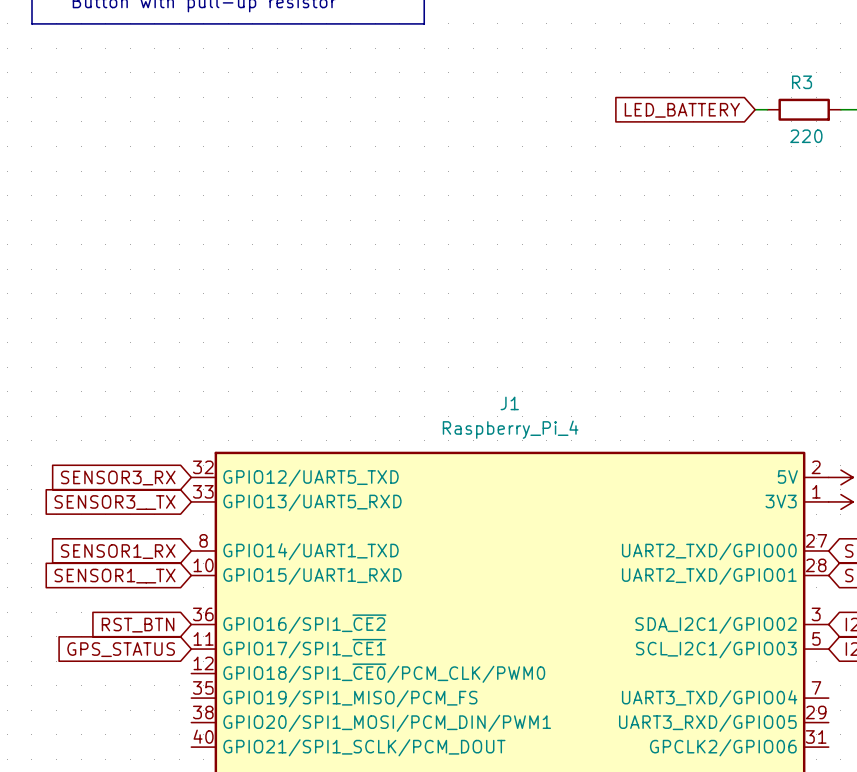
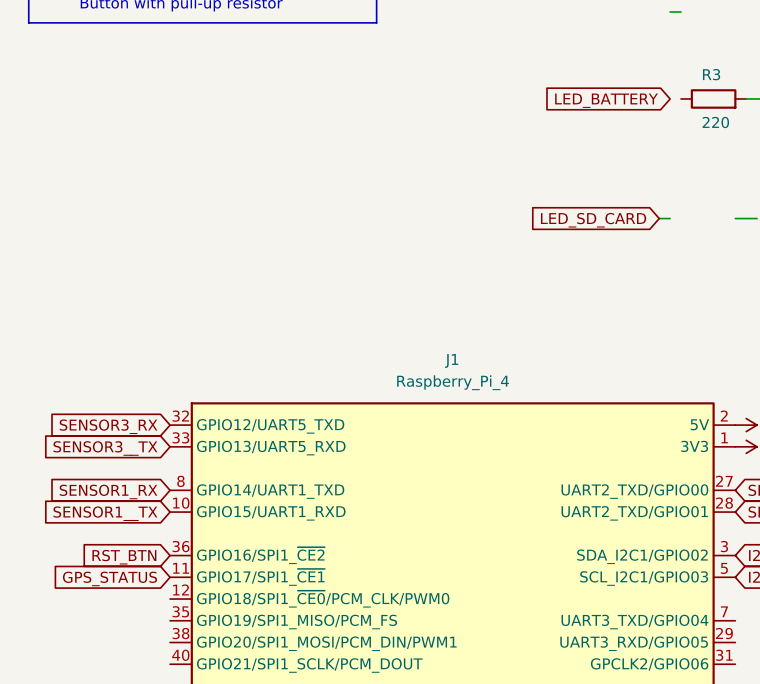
wire: (755, 109) (767, 109) -> (670, 12) (680, 12)
wire: none -> (659, 218) (670, 218)
wire: none -> (735, 218) (757, 218)
global label: none -> LED_SD_CARD (593, 220)

